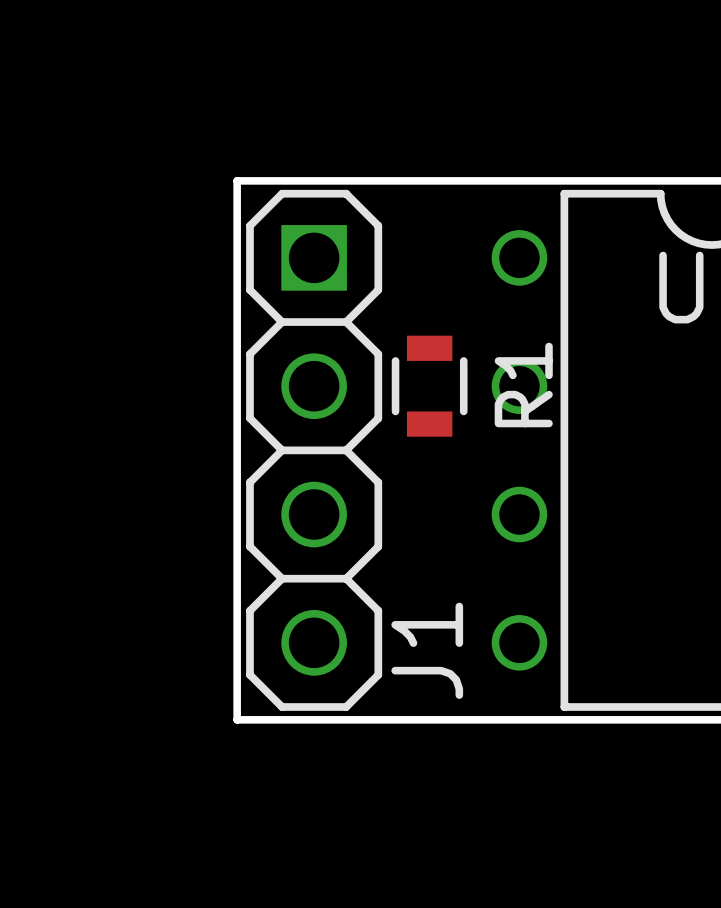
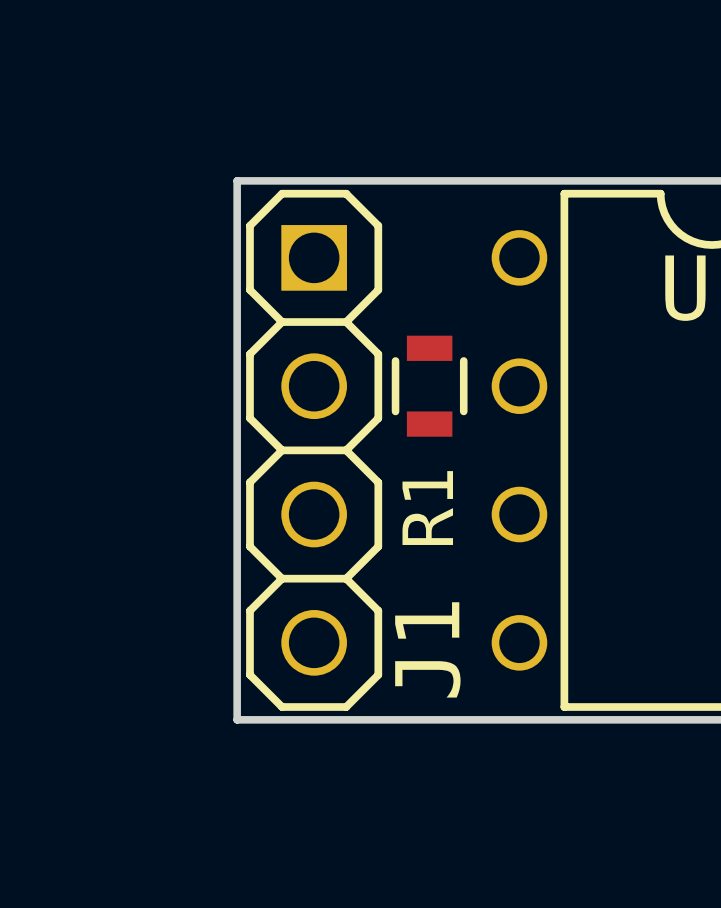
R1 name position: R1 (523, 384) -> R1 (427, 508)

